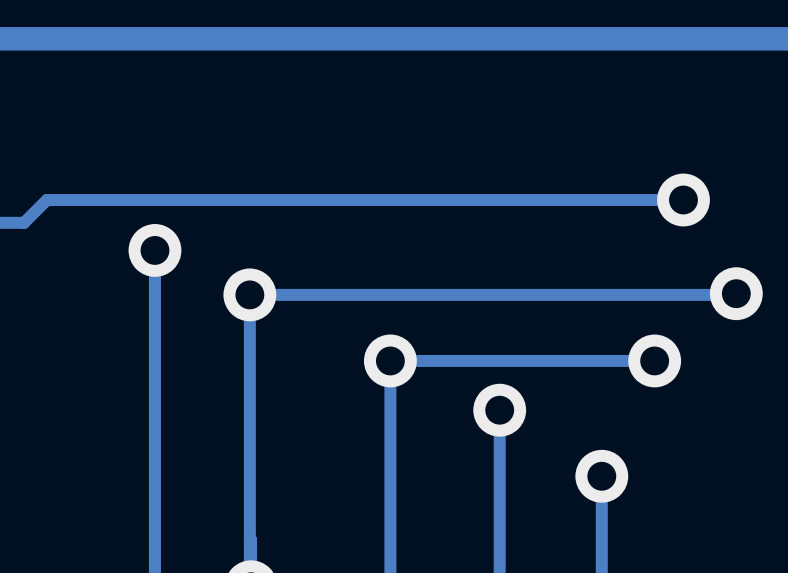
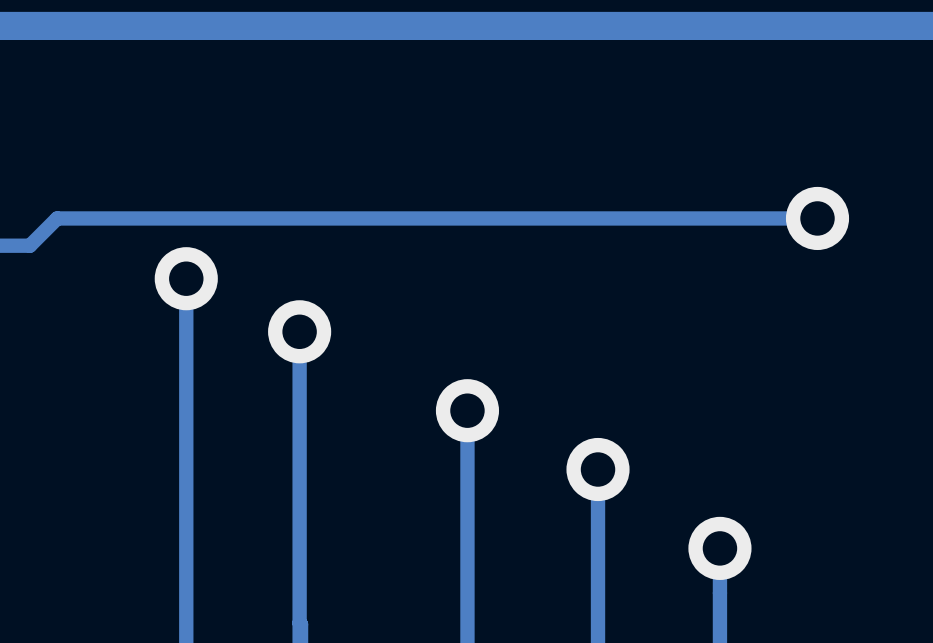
via: (736, 293) -> none
track: (735, 294) (249, 294) -> none
track: (654, 360) (390, 360) -> none
via: (654, 360) -> none

